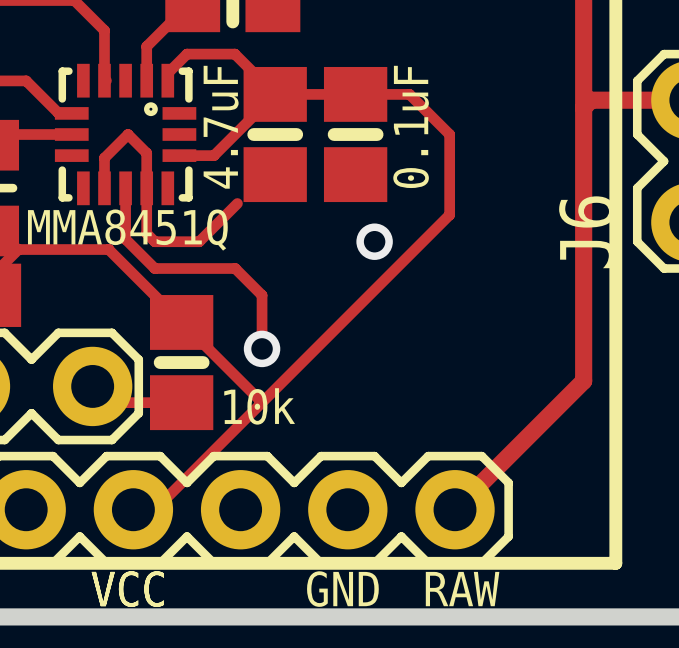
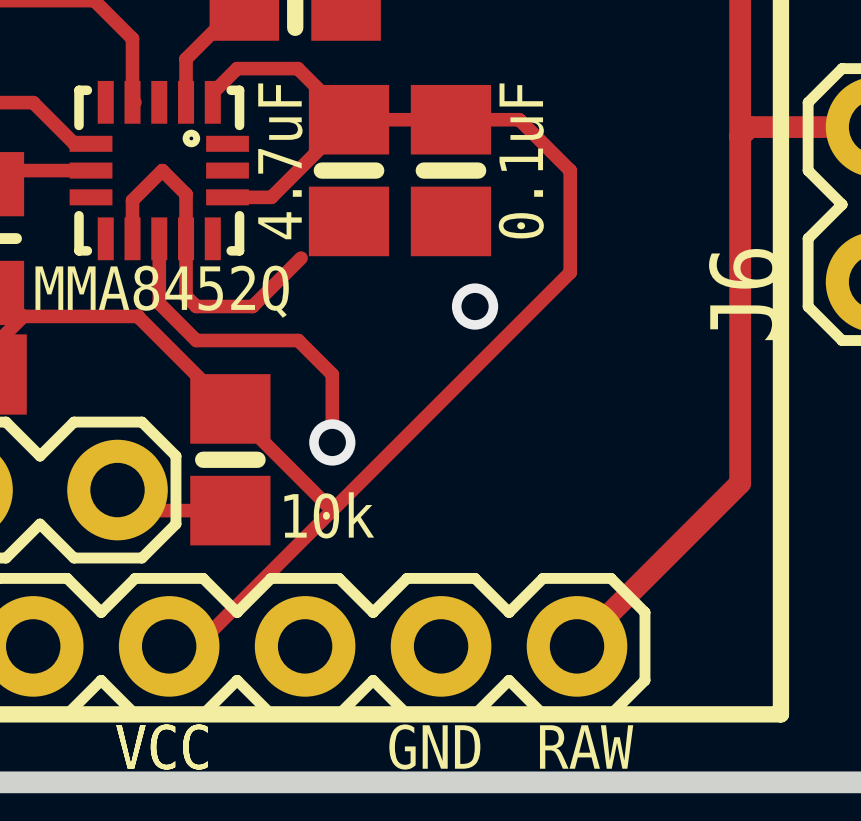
text: MMA8451Q (127, 230) -> MMA8452Q (162, 291)

